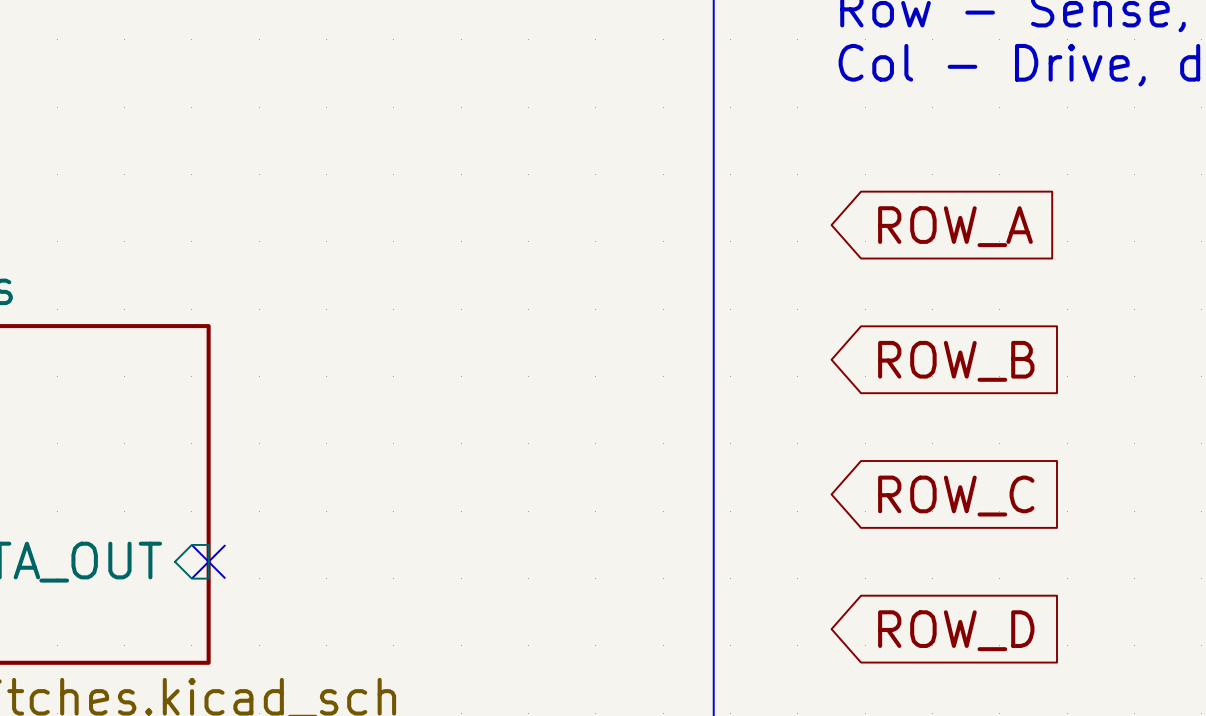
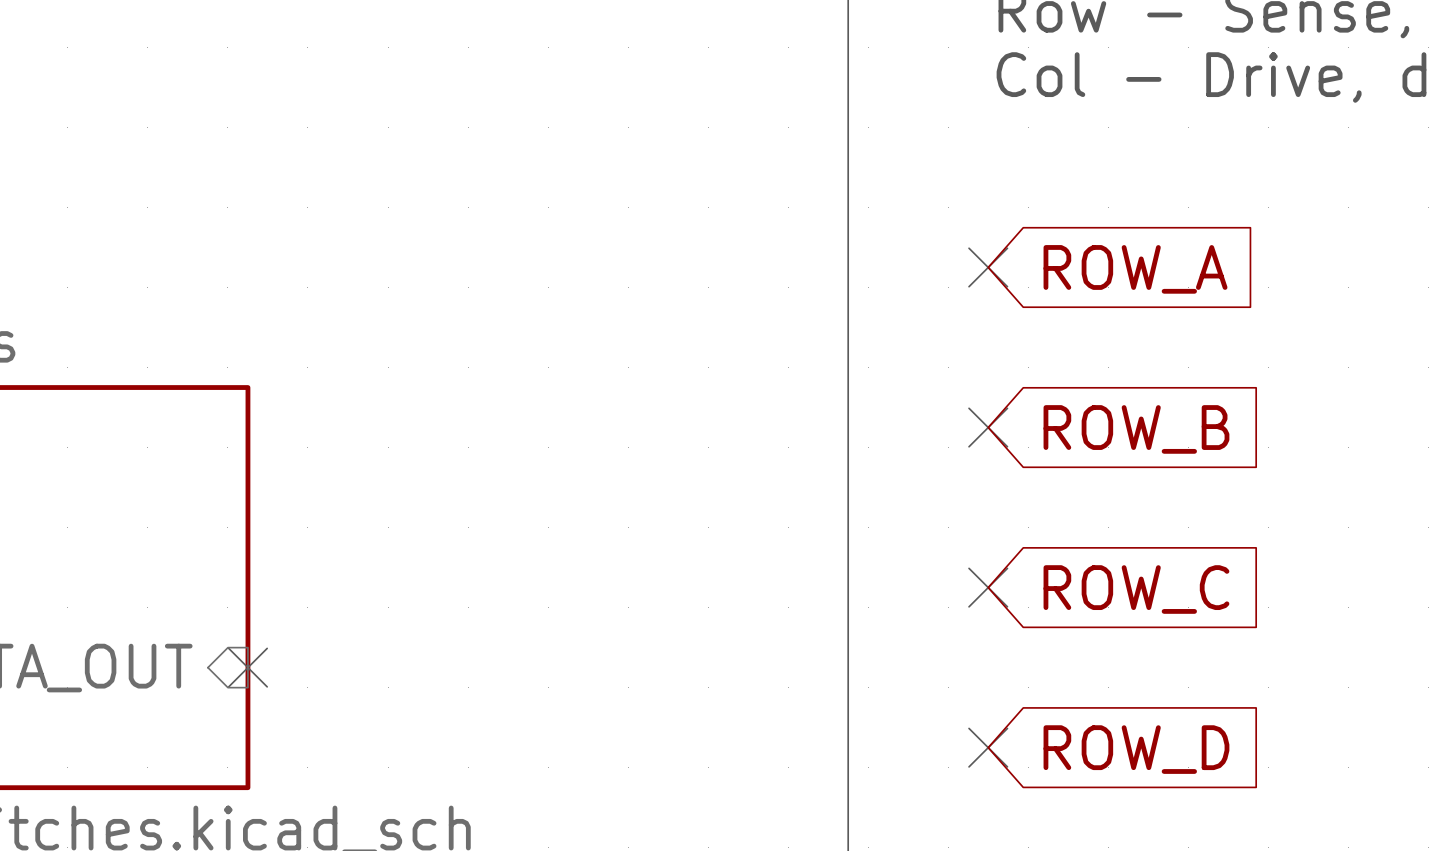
no-connect mark: none -> (988, 267)
no-connect mark: none -> (988, 427)
no-connect mark: none -> (988, 587)
no-connect mark: none -> (988, 747)

